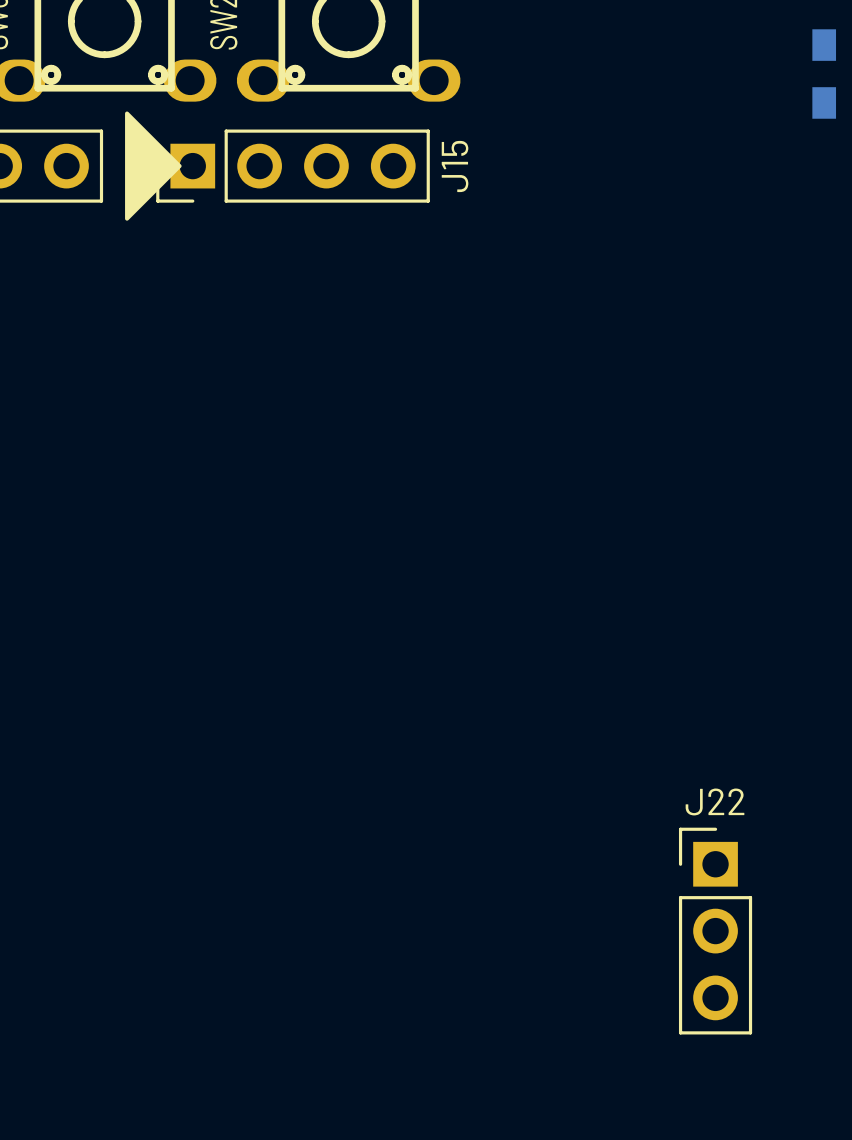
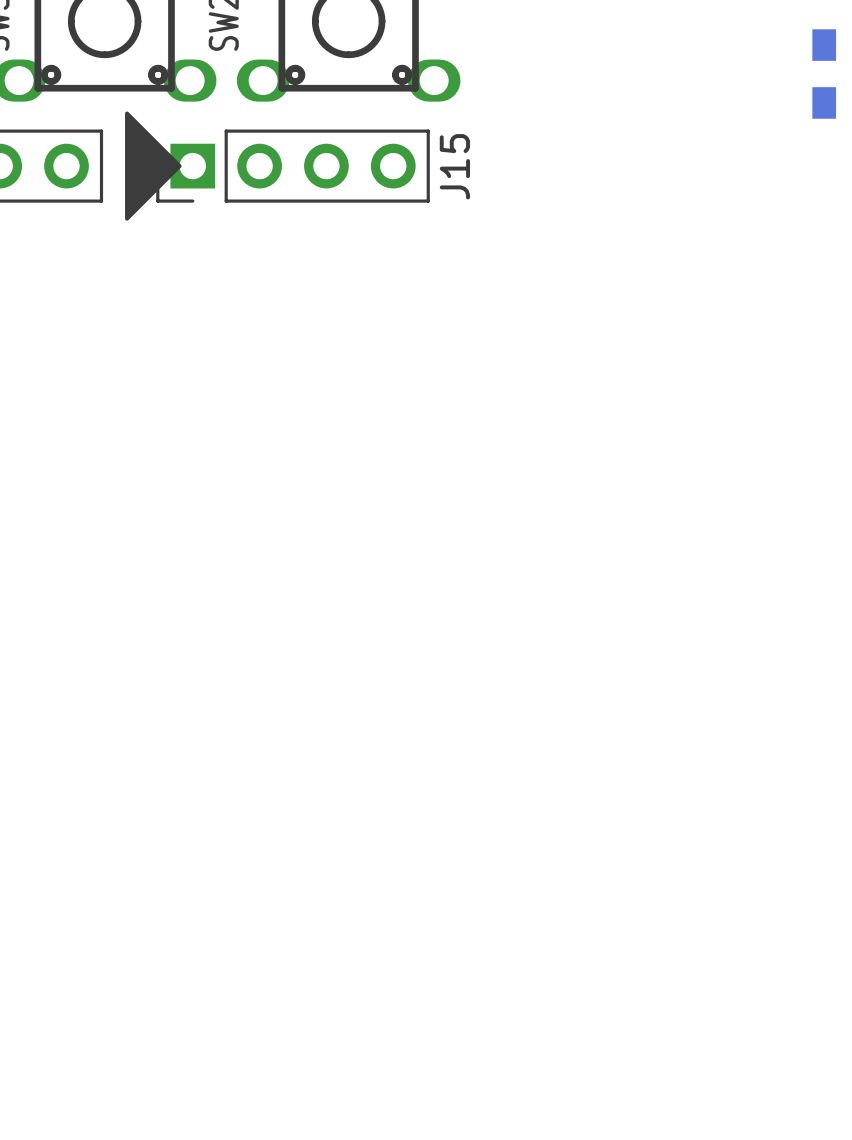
J22: (715, 931) -> none

